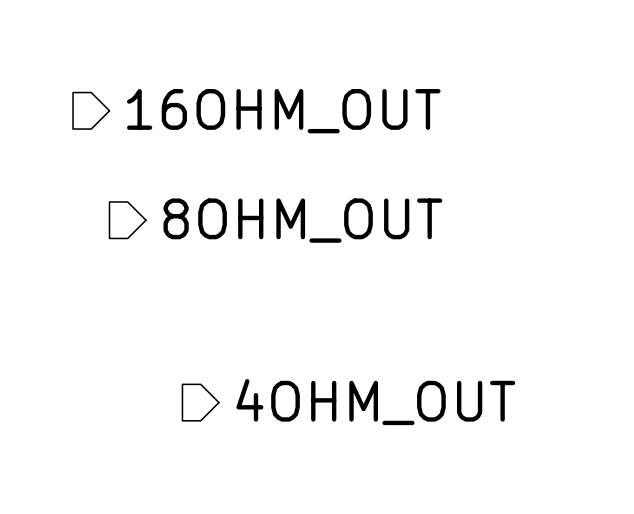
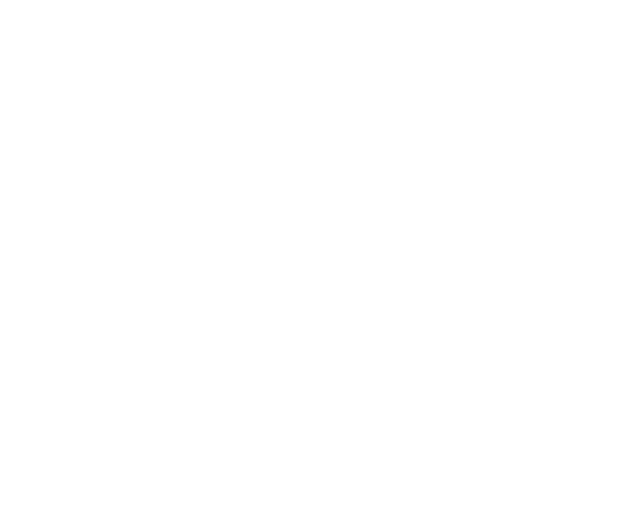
hierarchical label: 16OHM_OUT (283, 111) -> none
hierarchical label: 8OHM_OUT (302, 220) -> none
hierarchical label: 4OHM_OUT (375, 402) -> none

